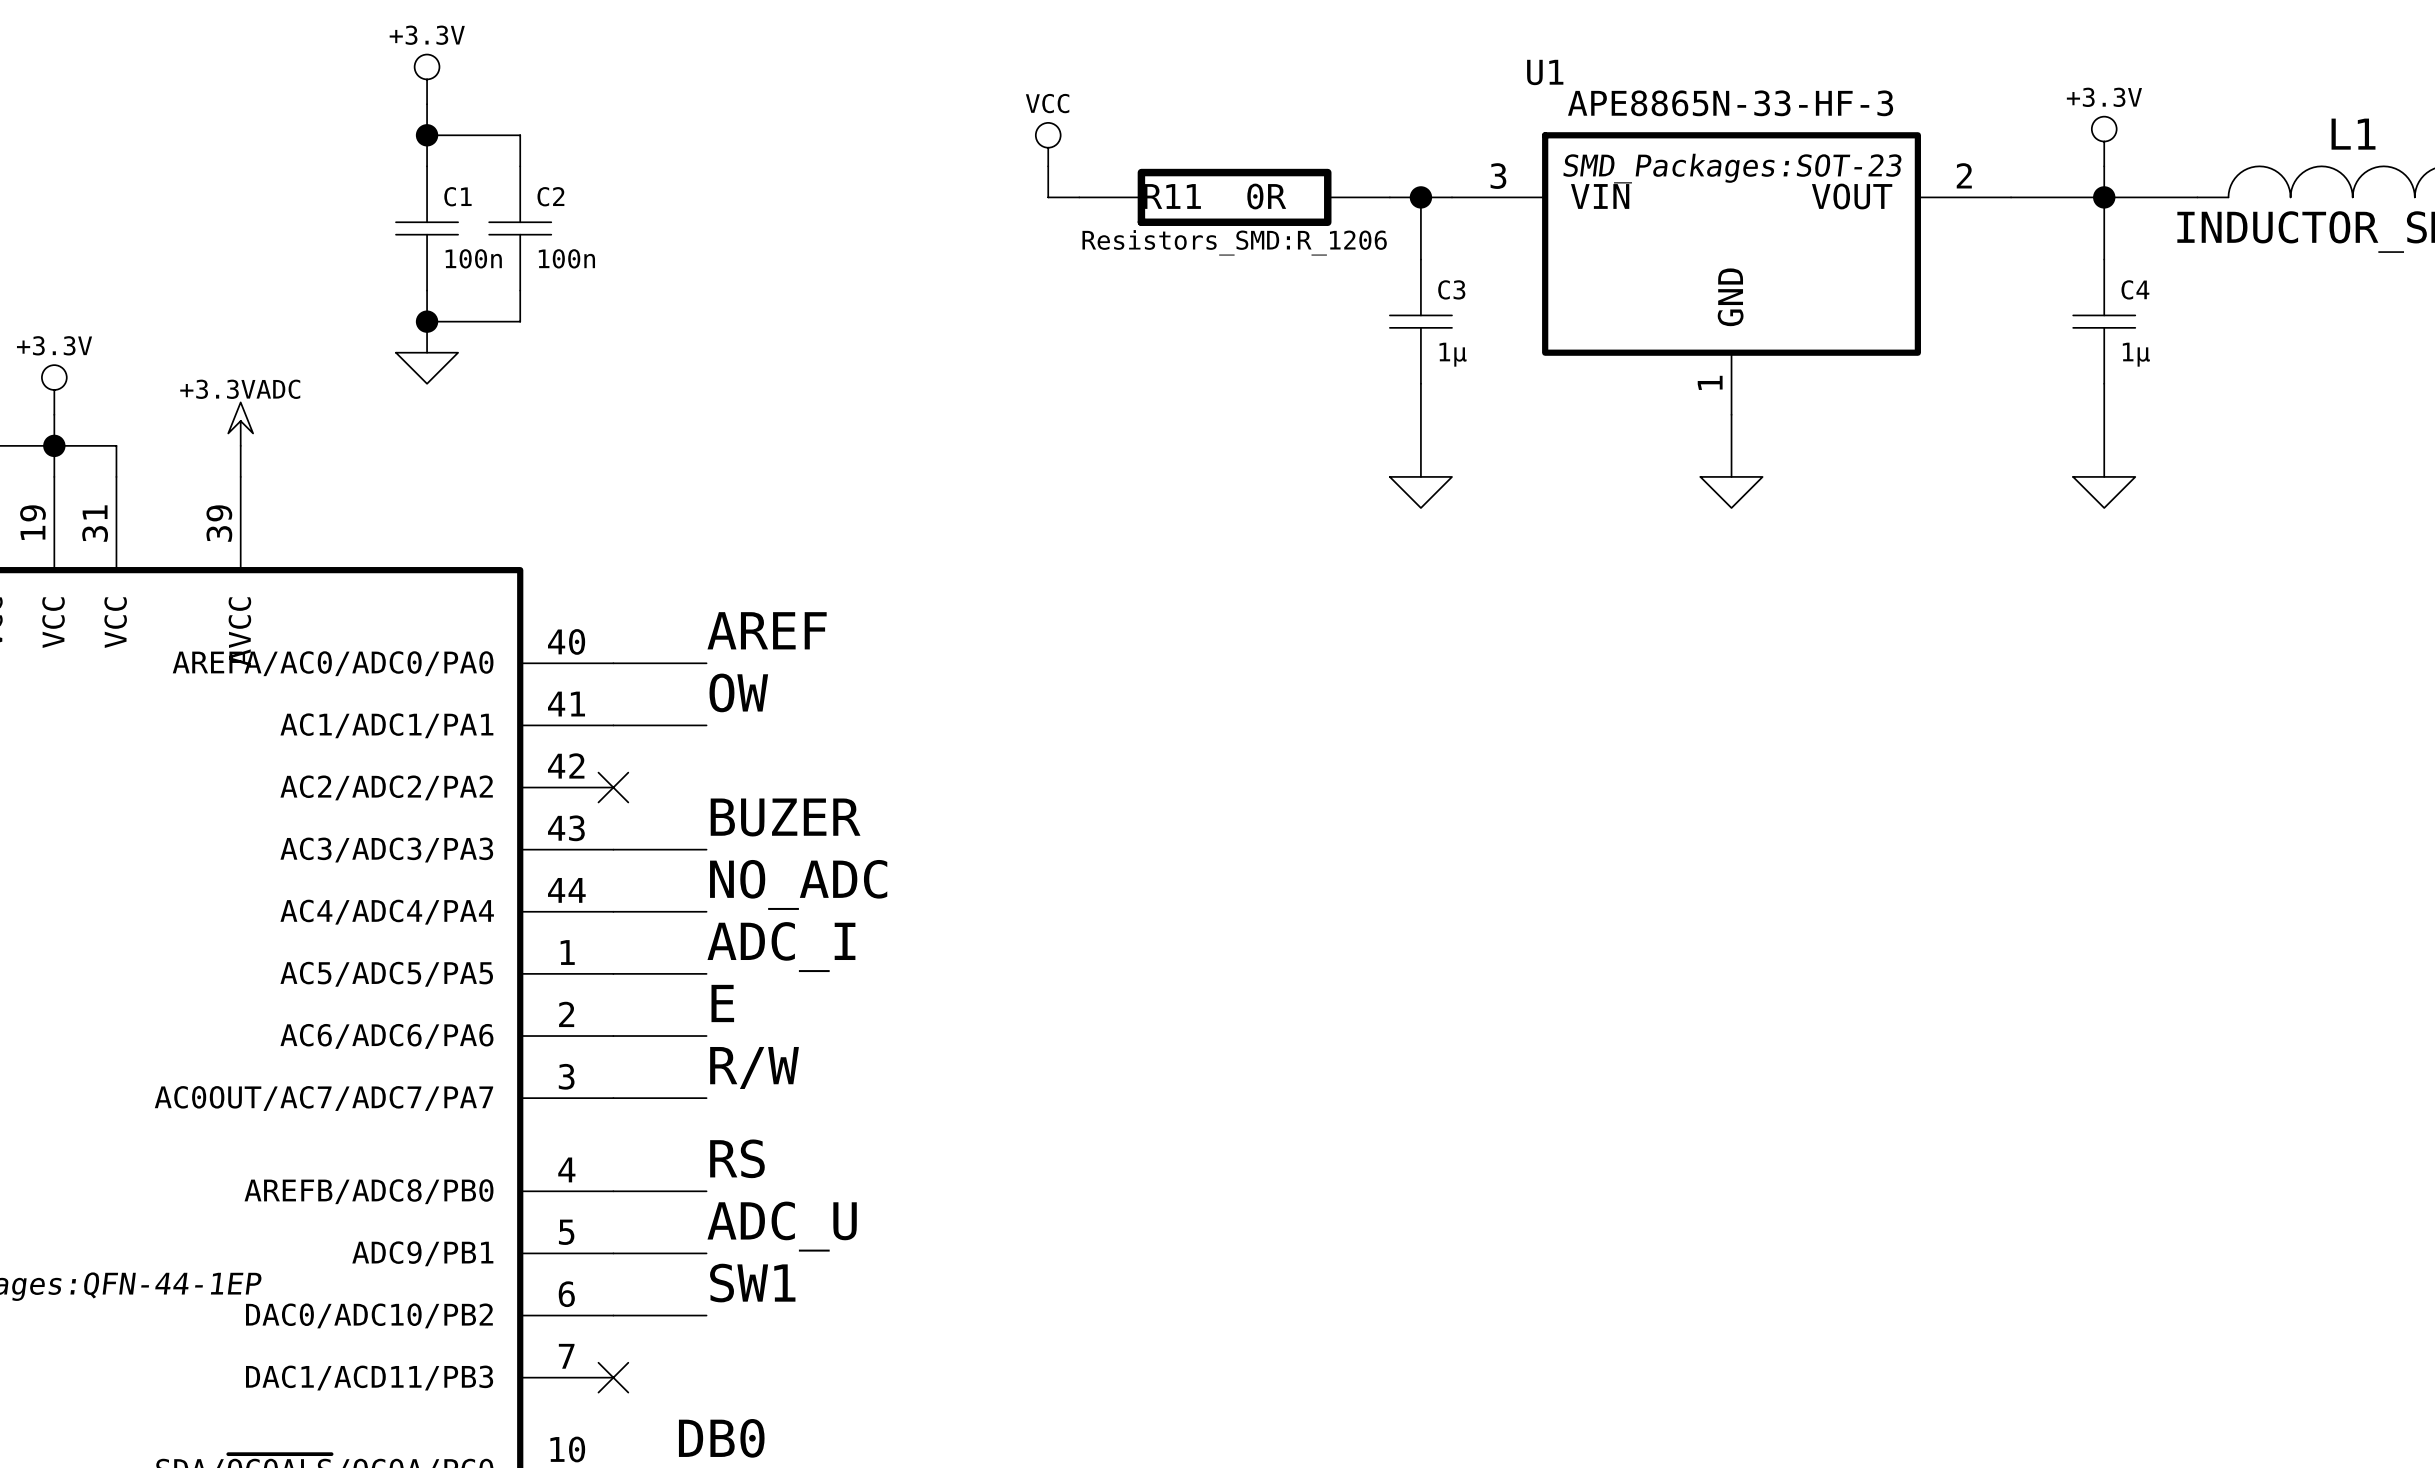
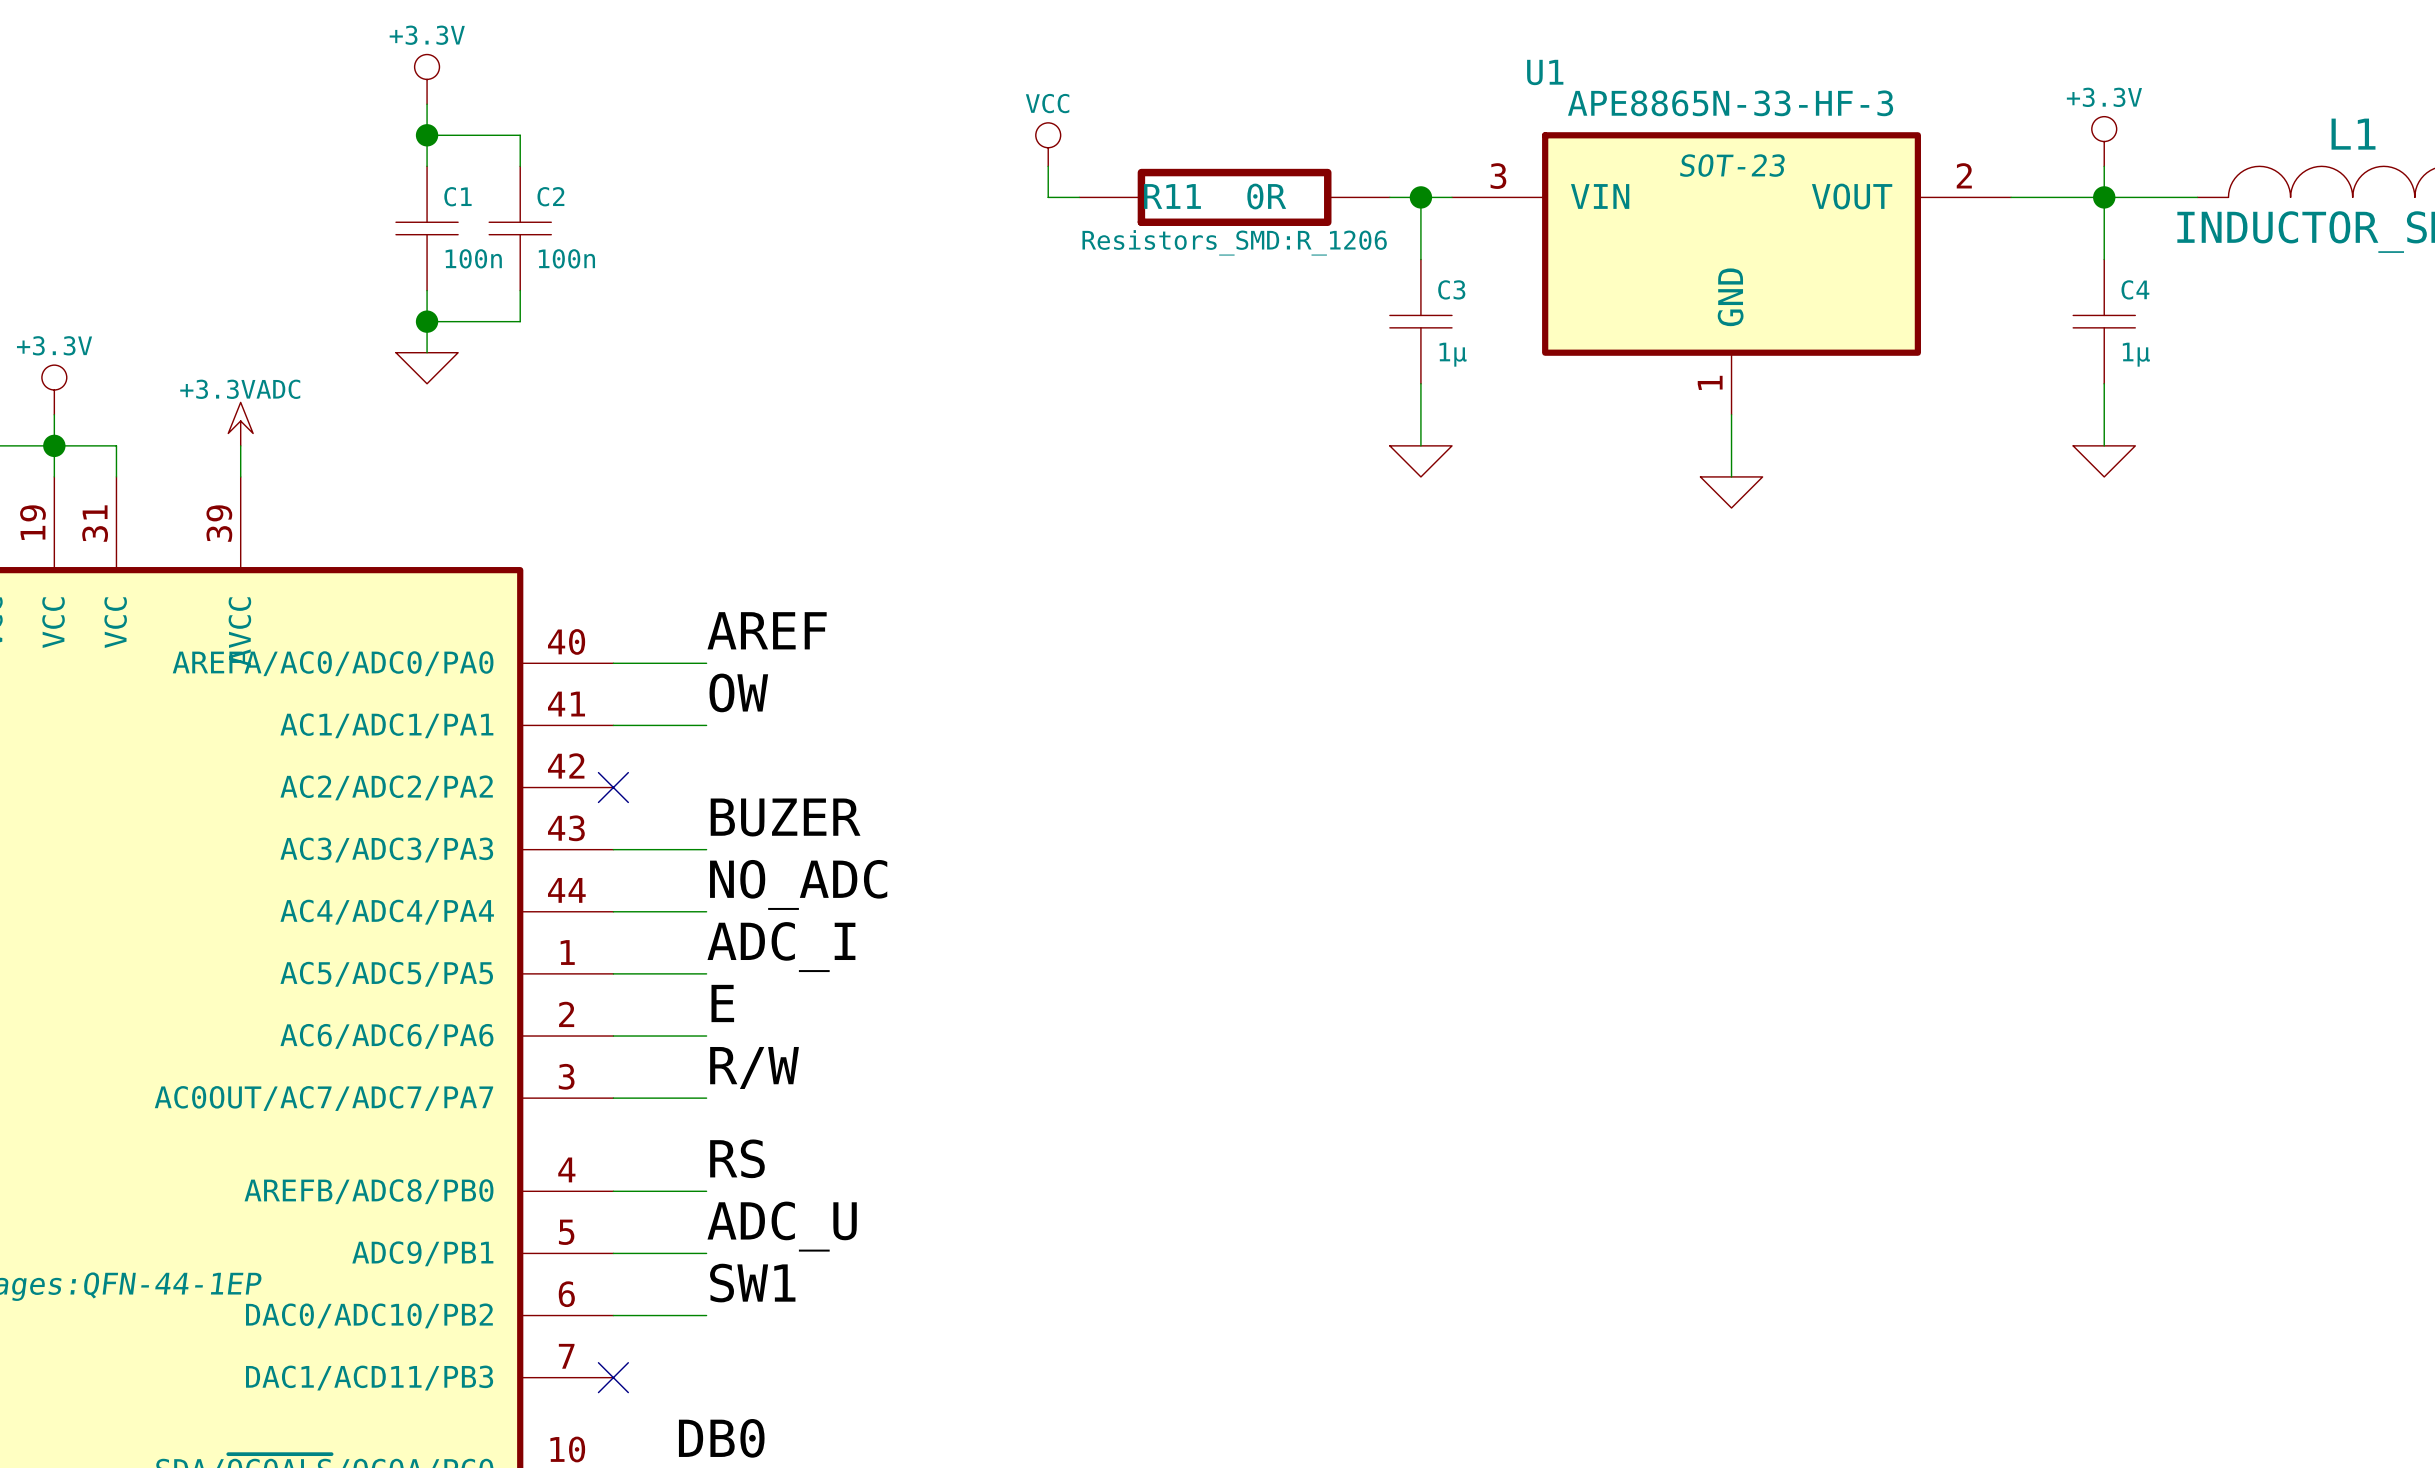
U1 text: SMD_Packages:SOT-23 (1732, 168) -> SOT-23 (1732, 165)
wire: (1420, 445) (1420, 476) -> none
wire: (2104, 445) (2104, 476) -> none
power symbol position: (1420, 492) -> (1420, 461)
power symbol position: (2104, 492) -> (2104, 461)

